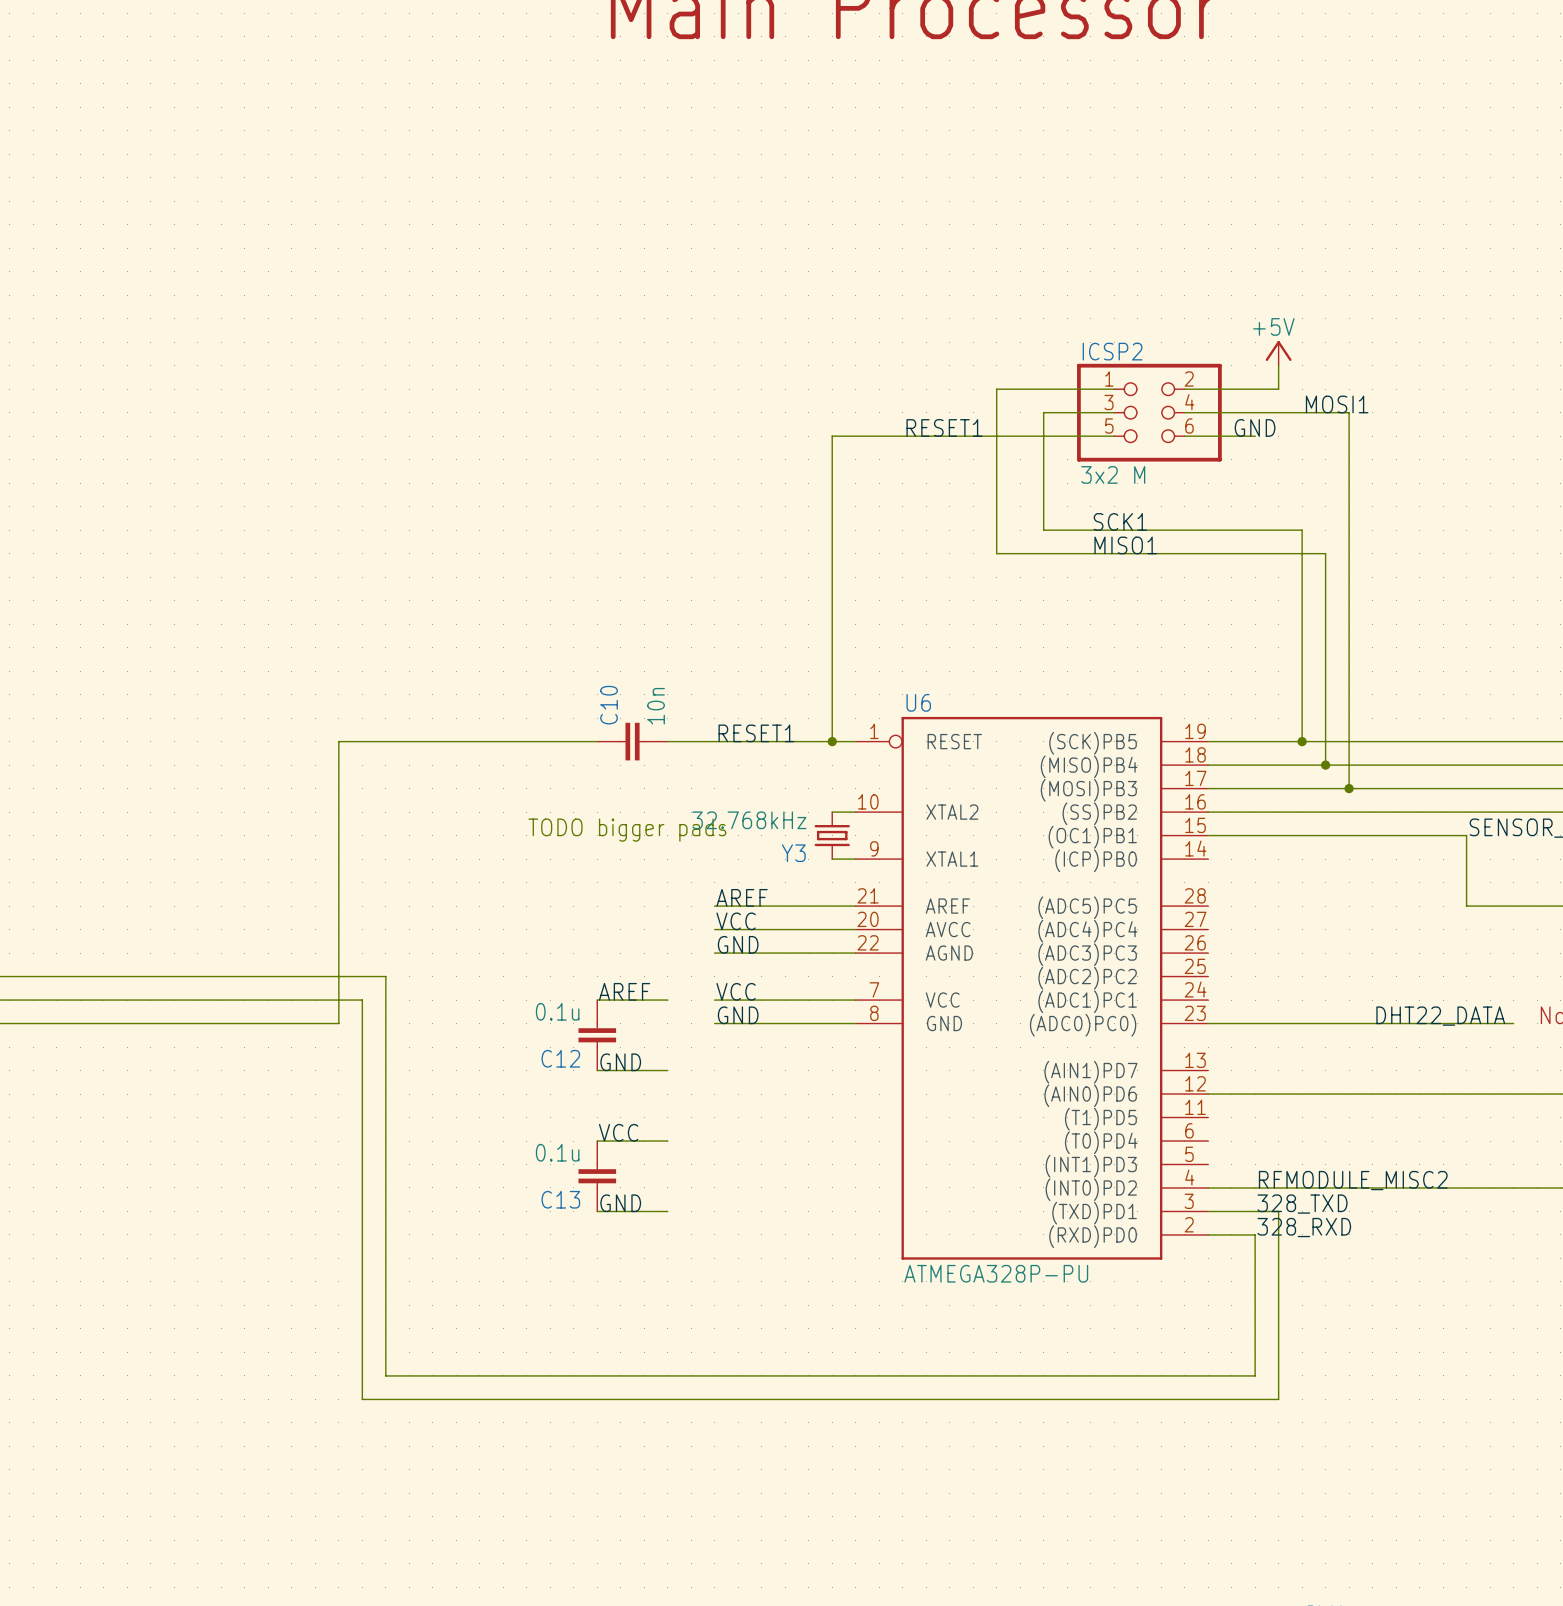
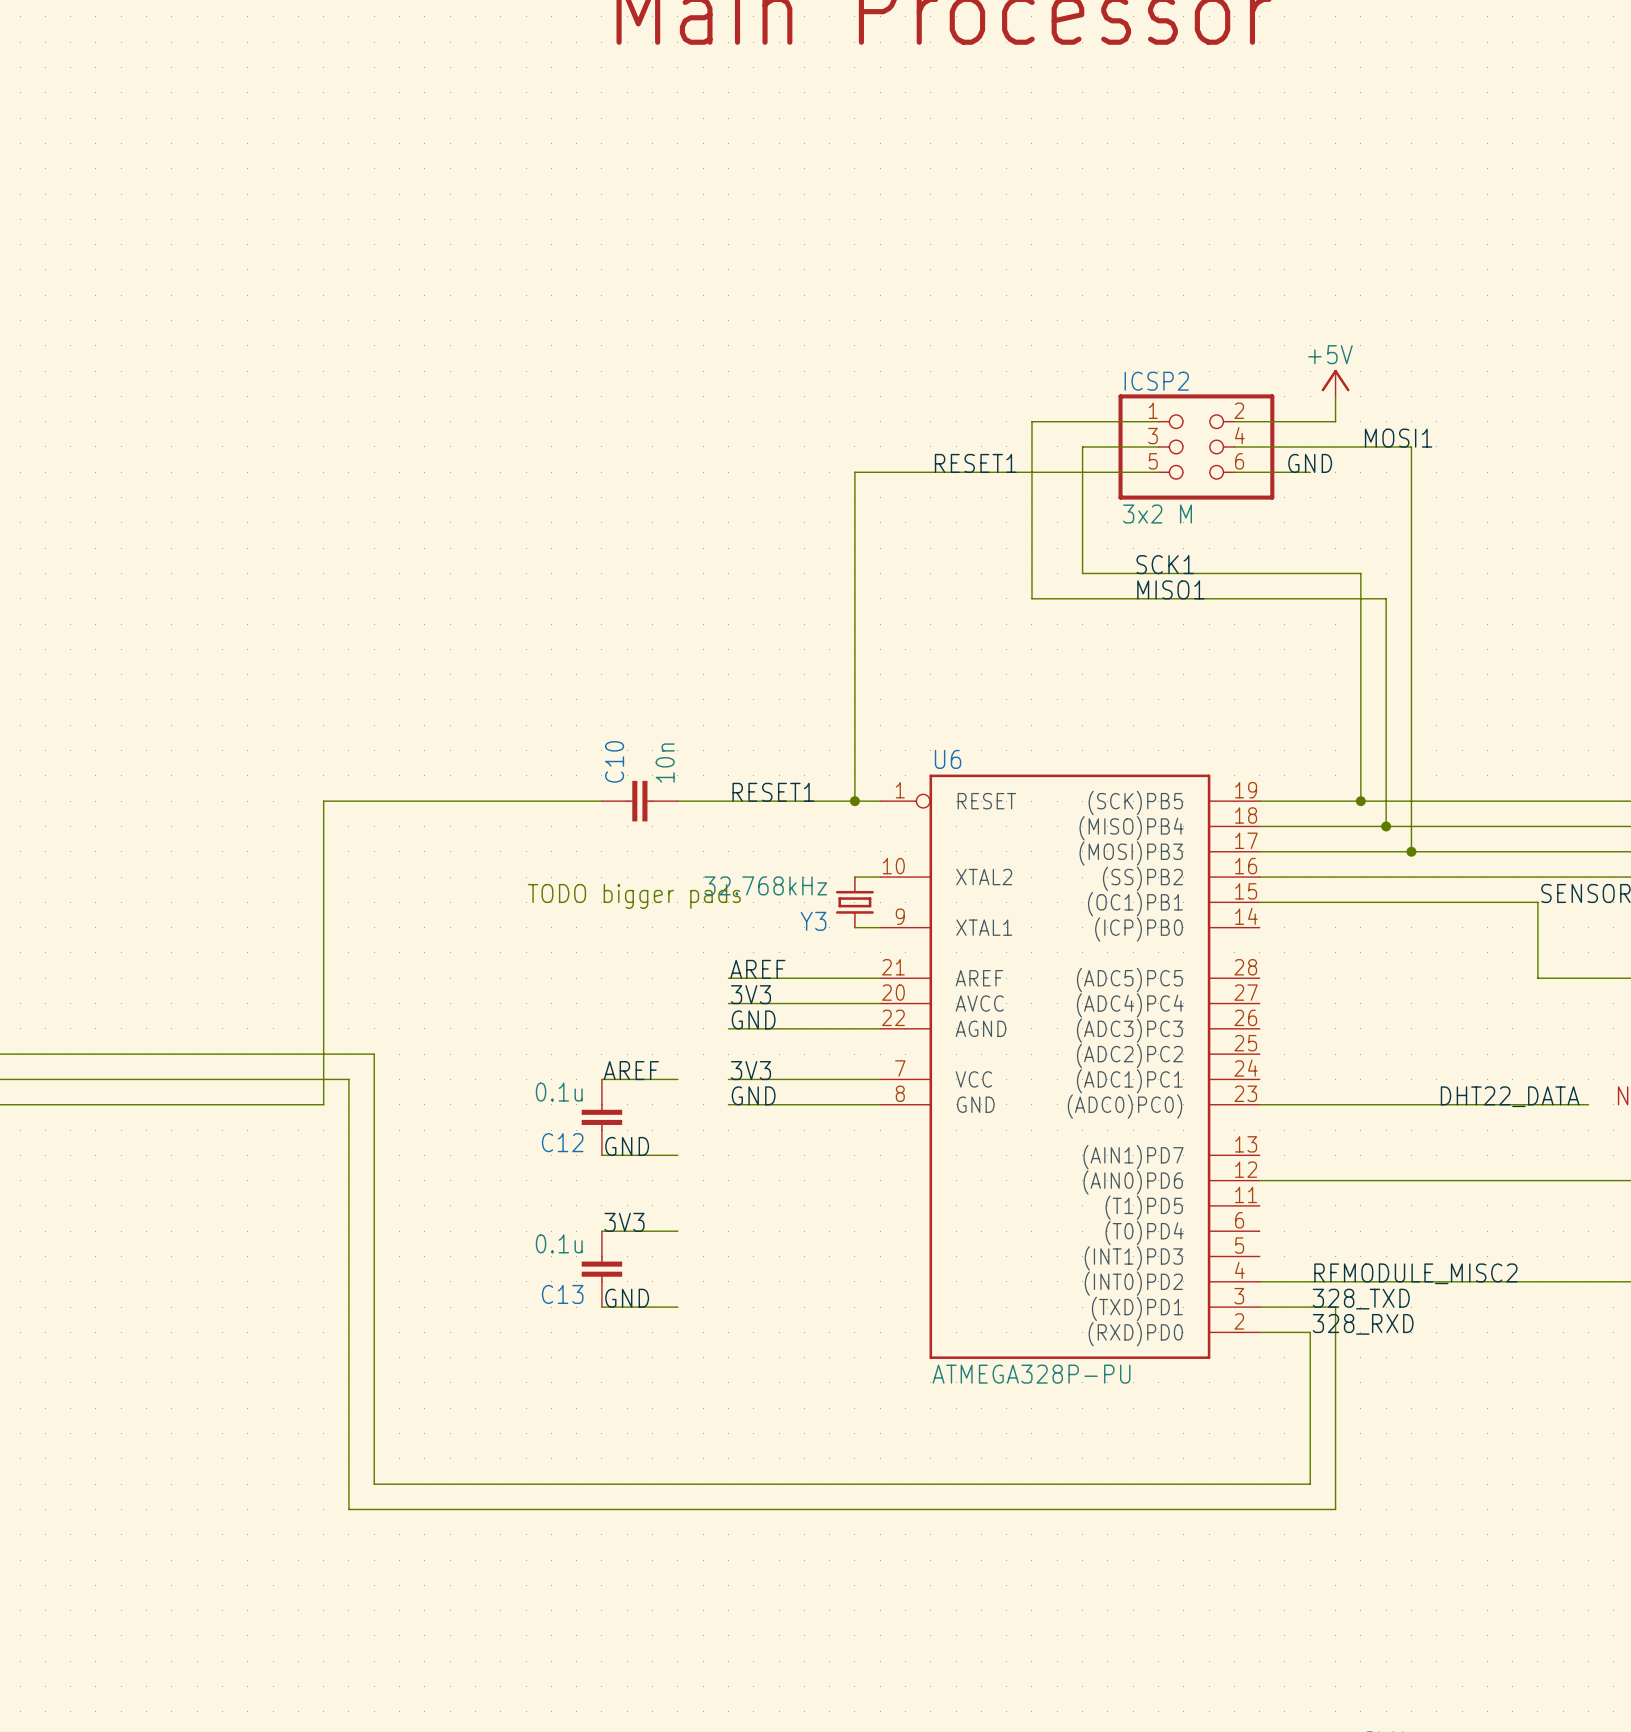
label: VCC (736, 921) -> 3V3 (750, 994)
label: VCC (736, 991) -> 3V3 (750, 1070)
label: VCC (618, 1132) -> 3V3 (624, 1222)

